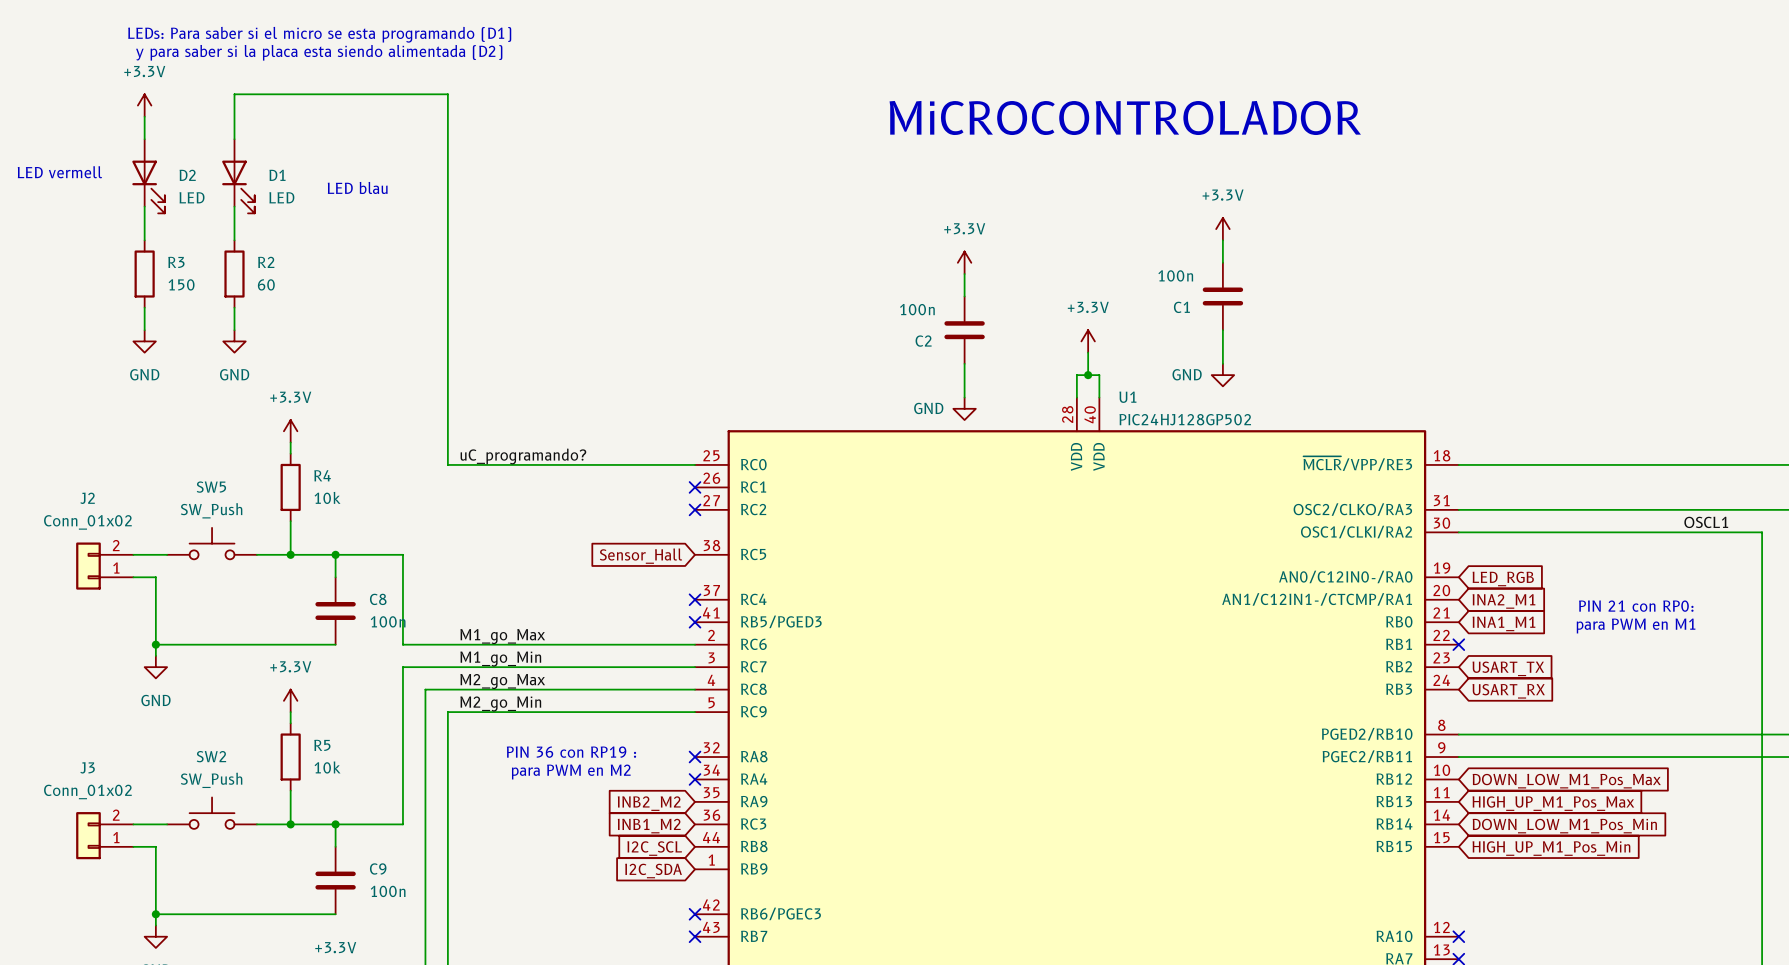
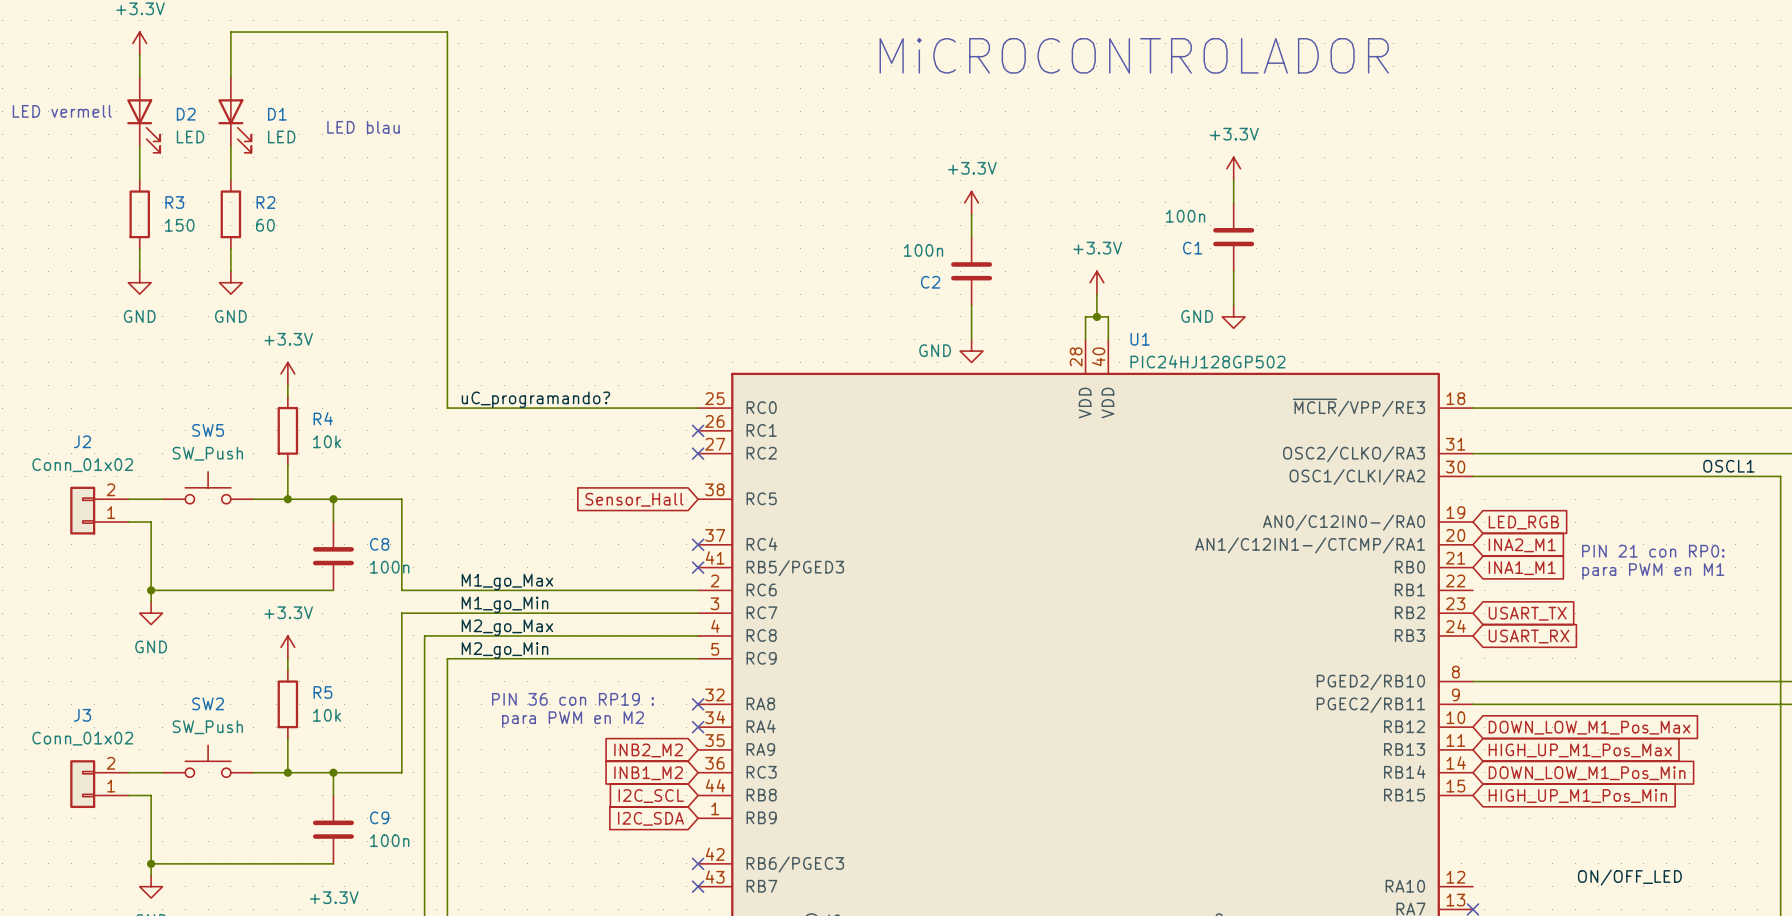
no-connect mark: (1458, 644) -> none
label: none -> ON/OFF_LED (1629, 877)
no-connect mark: (1458, 936) -> none

